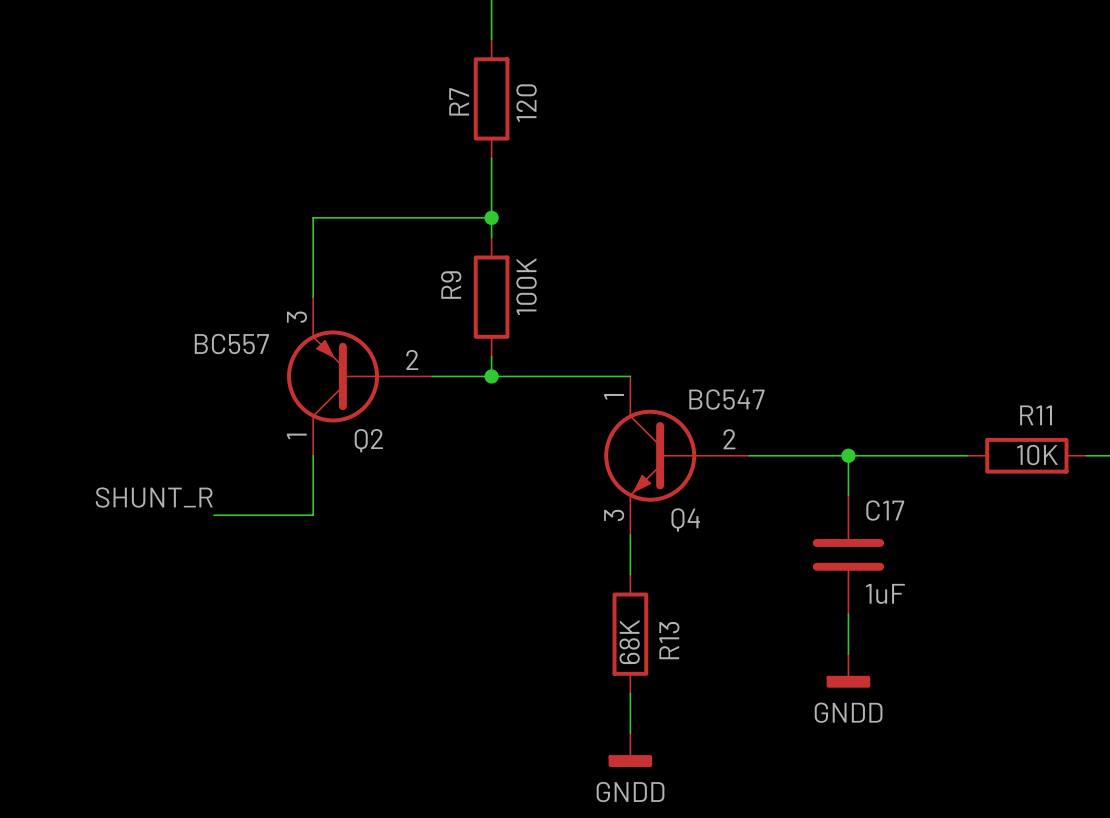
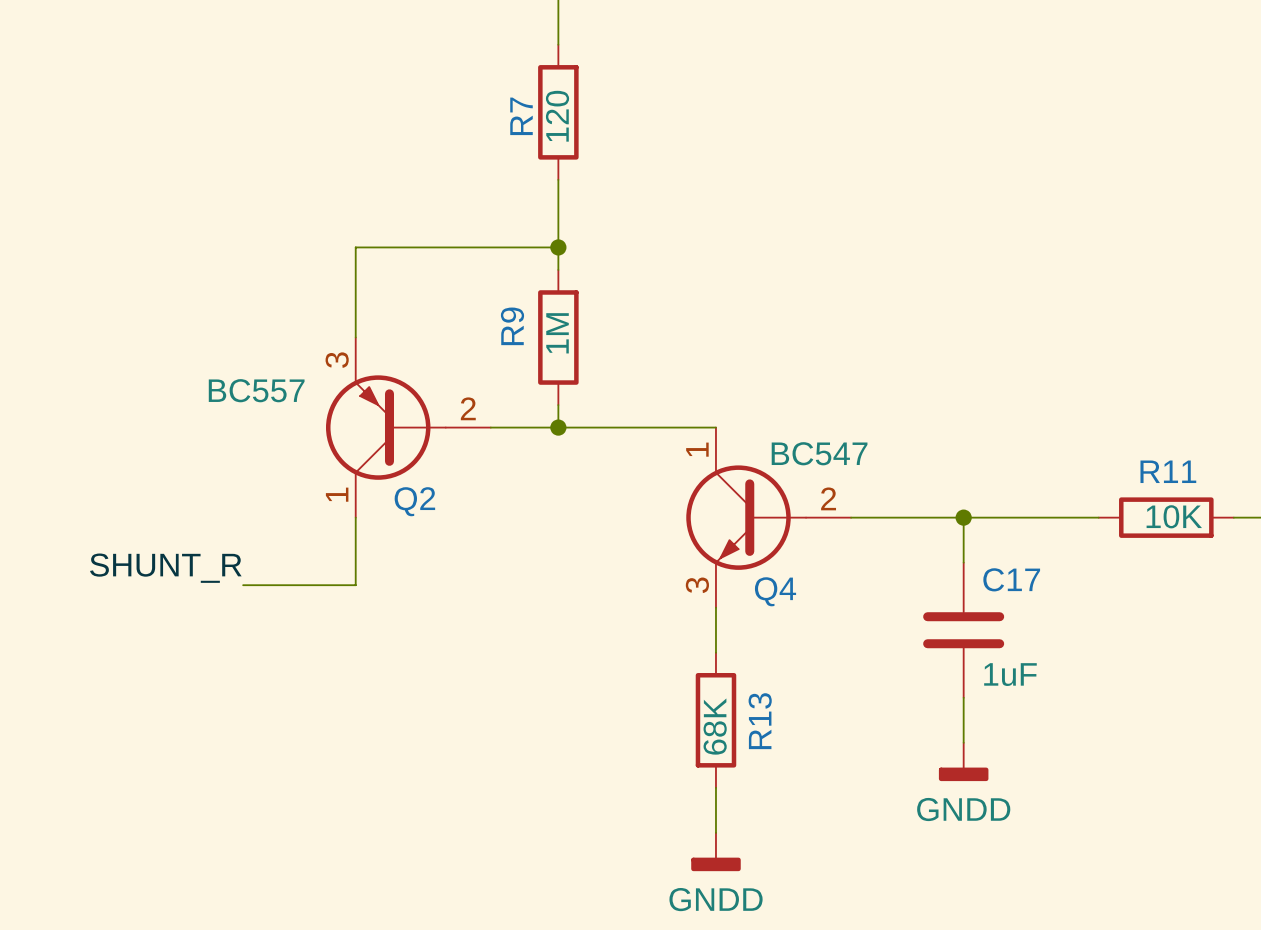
R7 value position: 120 (526, 103) -> 120 (557, 116)
R9 value: 100K (526, 286) -> 1M (557, 333)

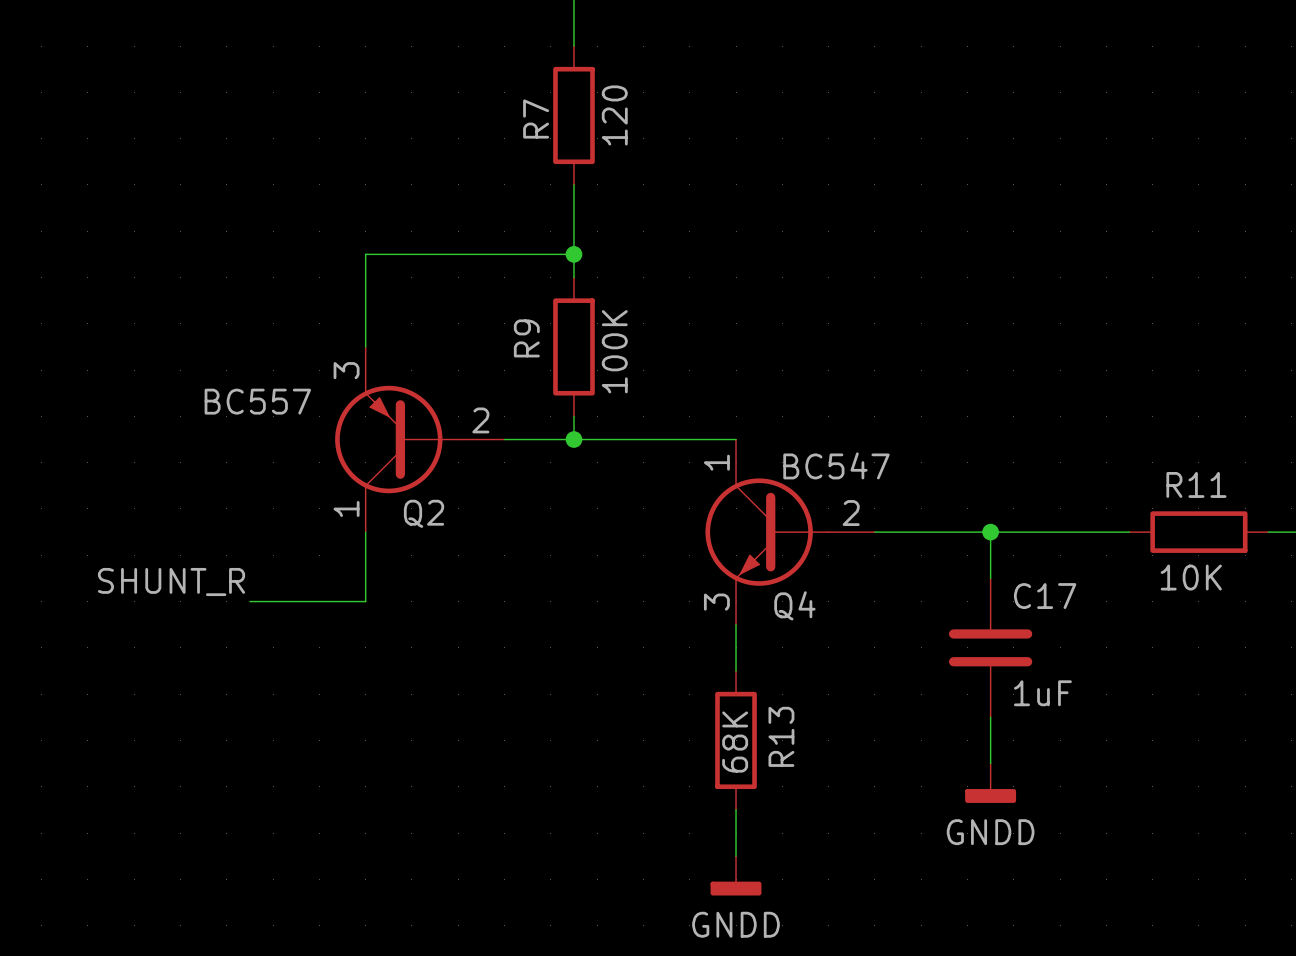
R7 value position: 120 (557, 116) -> 120 (614, 115)
R9 value: 1M (557, 333) -> 100K (614, 351)
R11 value position: 10K (1174, 516) -> 10K (1191, 577)

